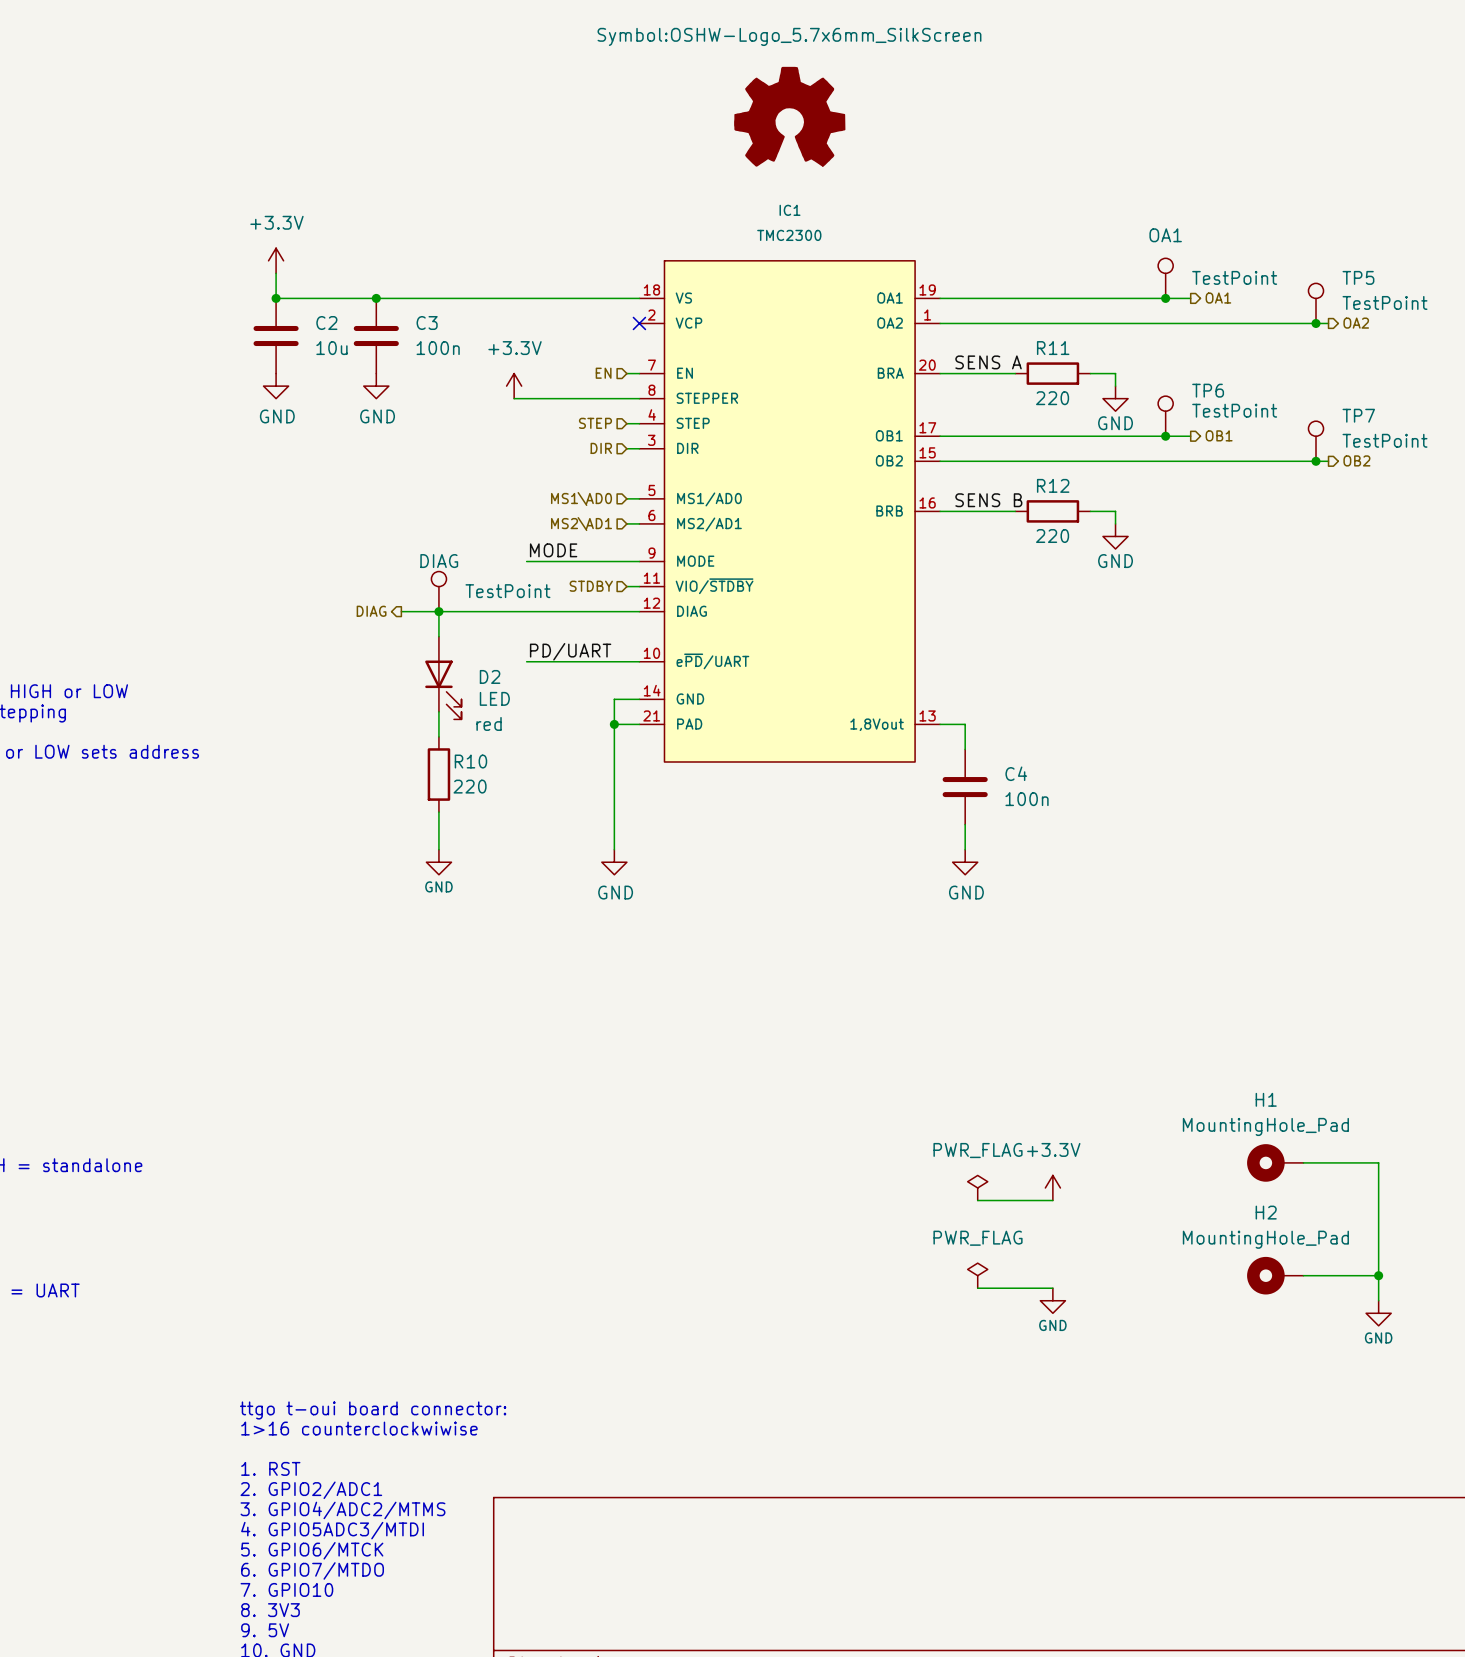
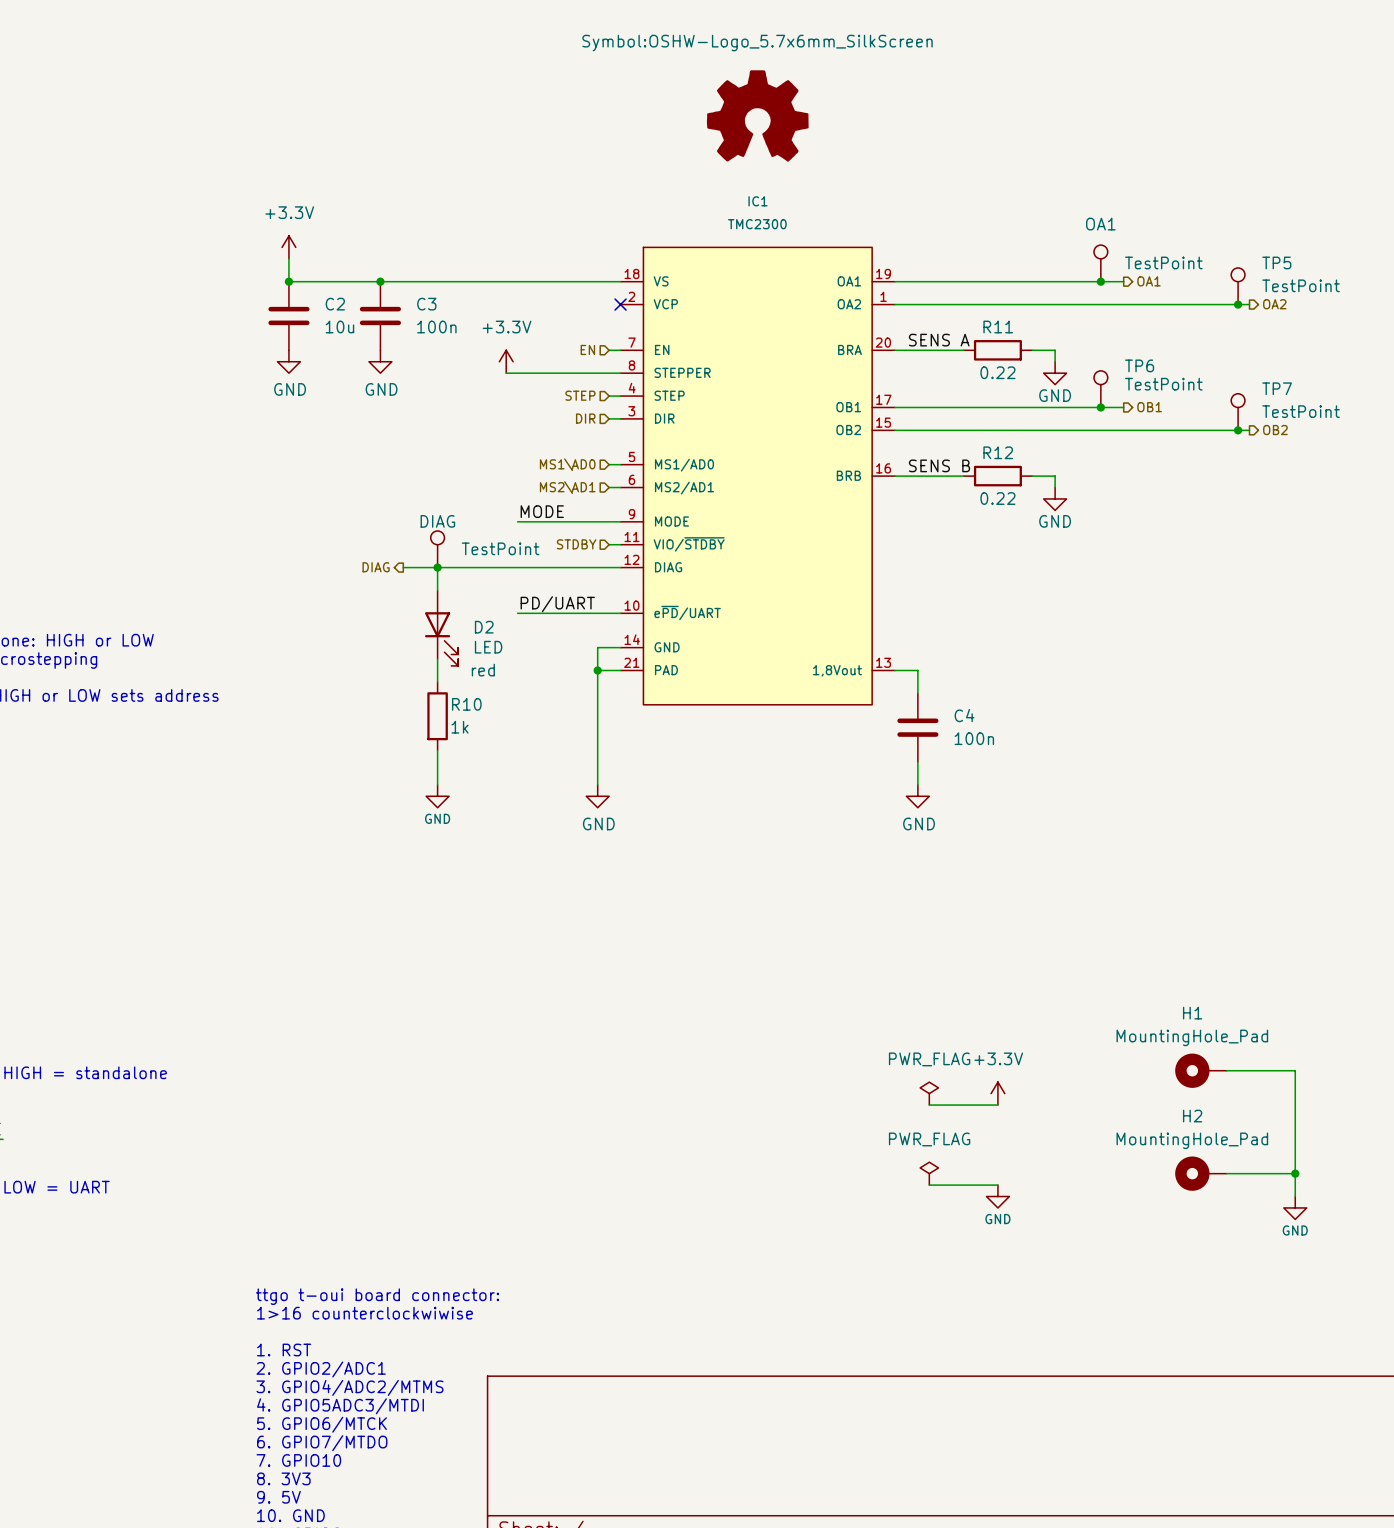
R11 value: 220 (1052, 398) -> 0.22 (997, 372)
R12 value: 220 (1052, 536) -> 0.22 (997, 498)
R10 value: 220 (470, 786) -> 1k (460, 727)

